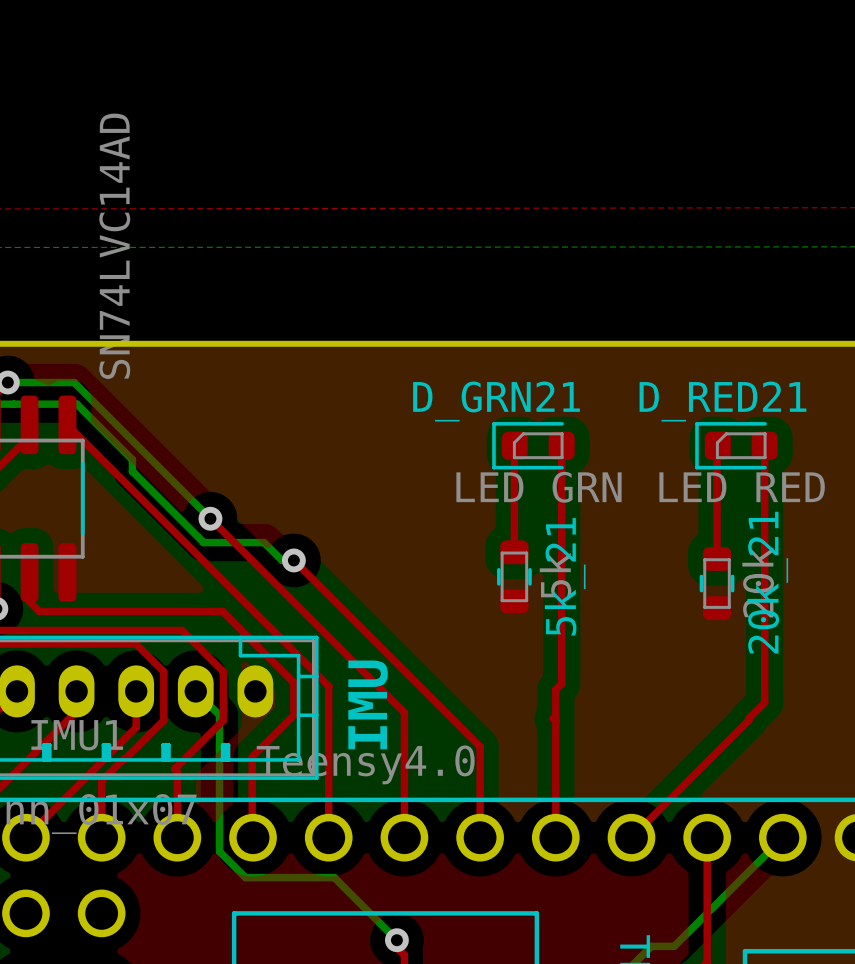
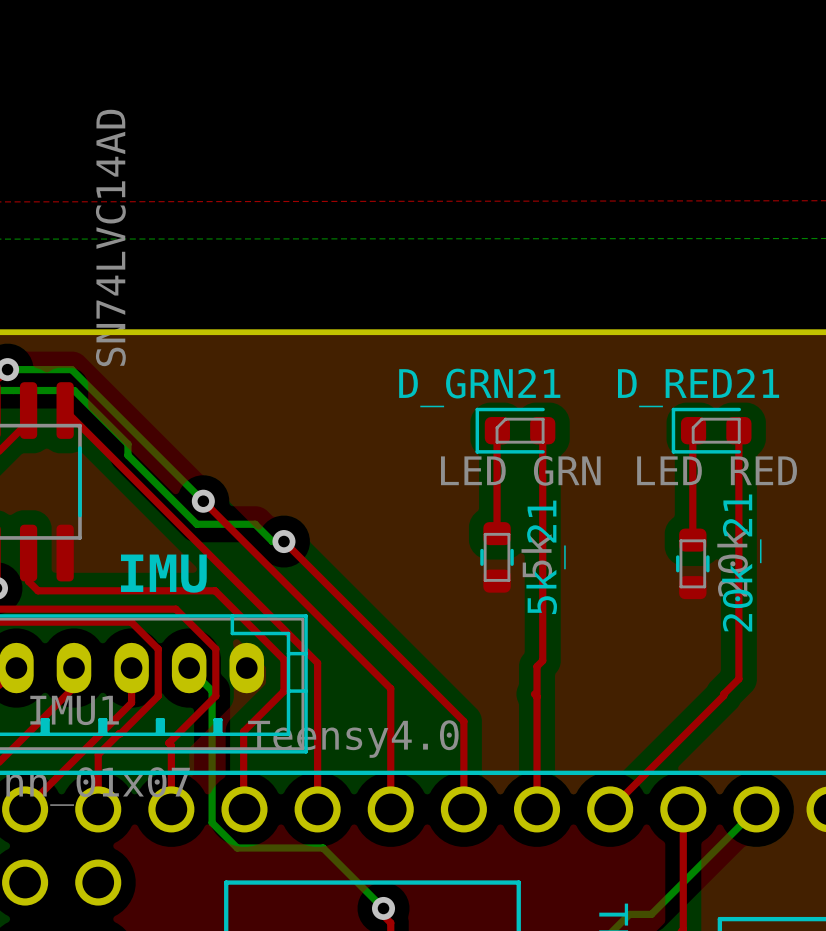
text rotation: 0° (368, 704) -> 90° clockwise (163, 573)
text position: IMU (368, 704) -> IMU (163, 573)

